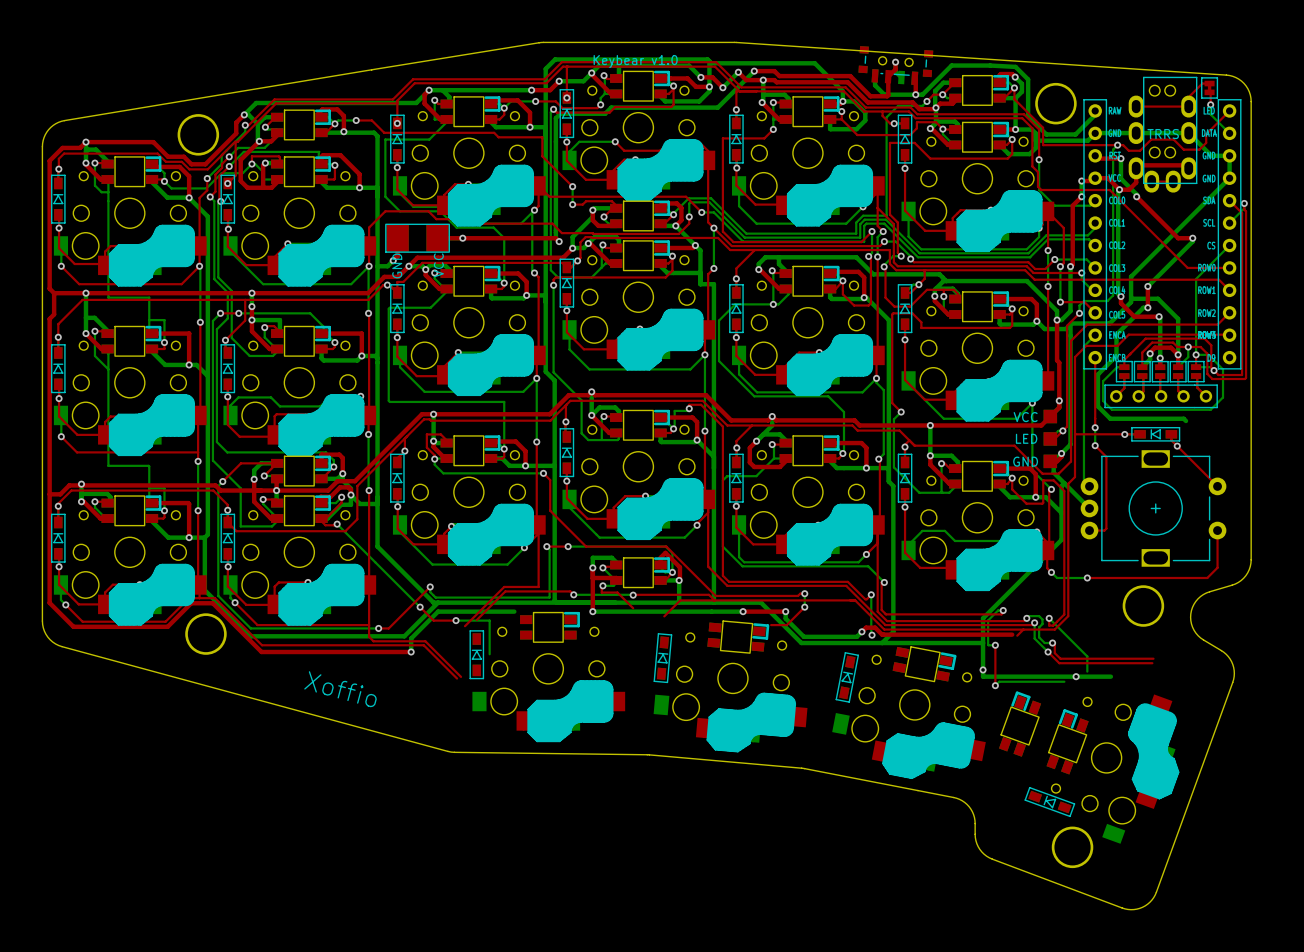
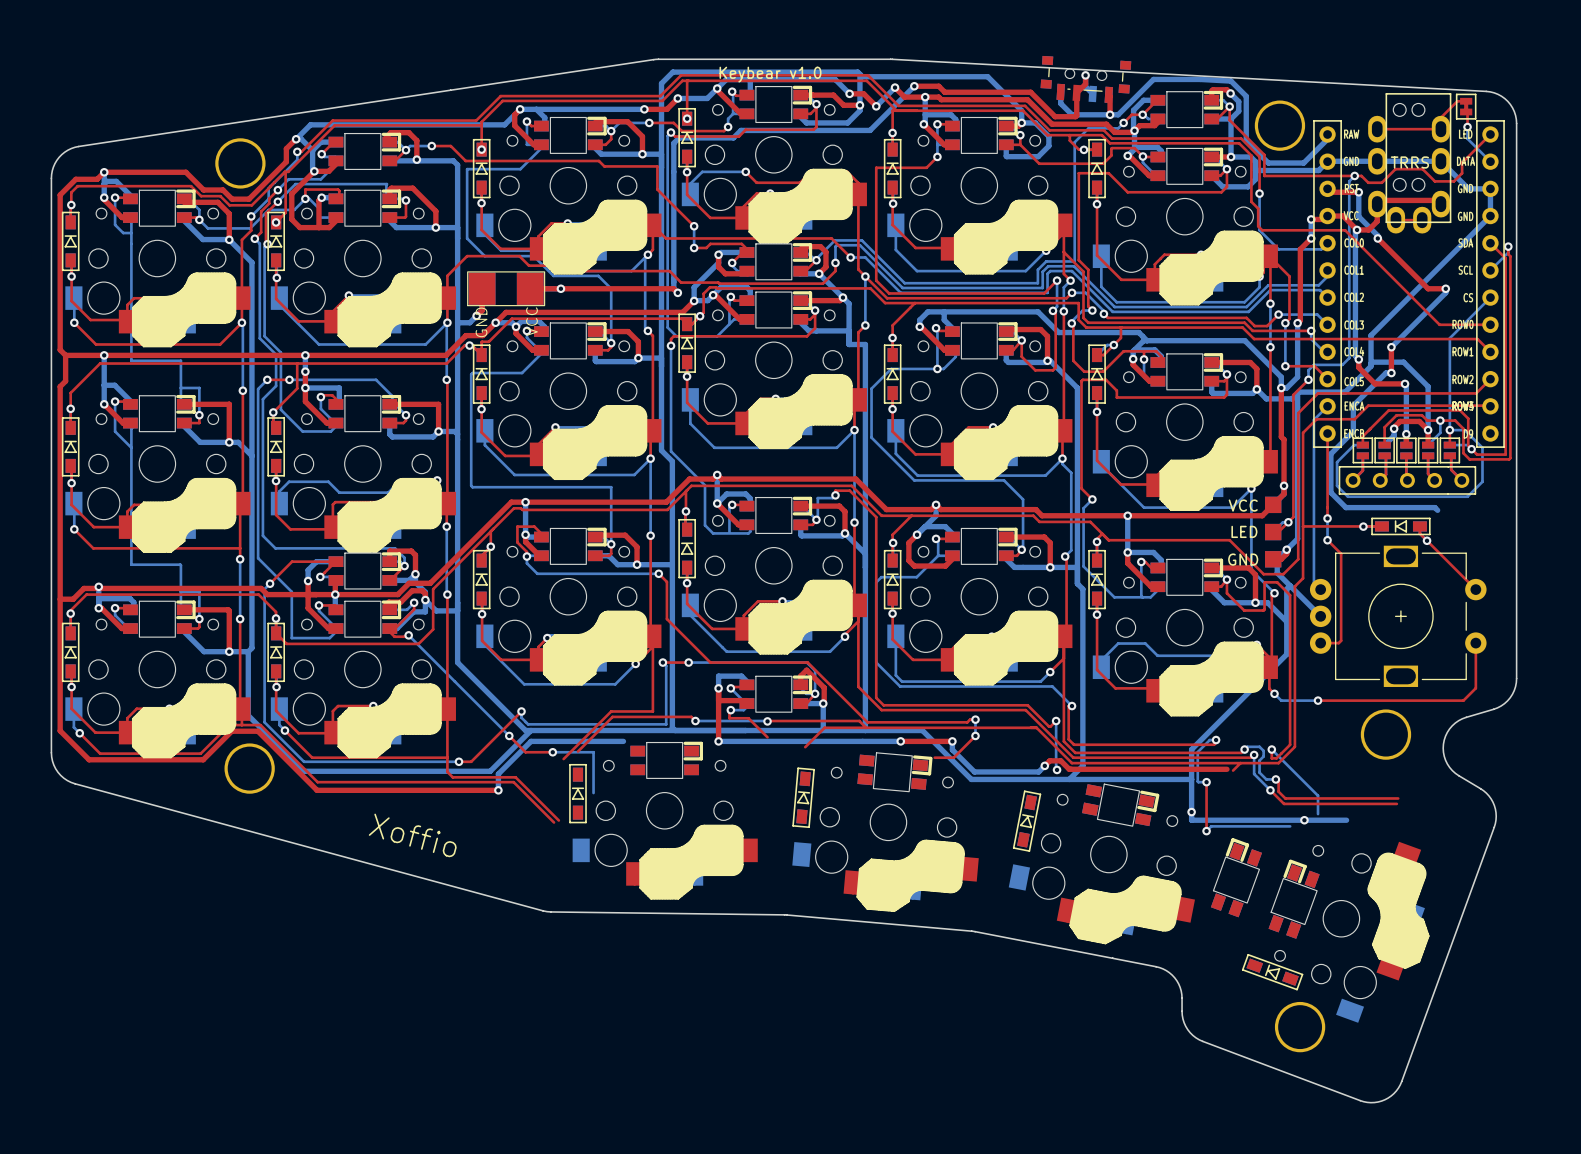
board edge: none -> (890, 59) (1486, 91) (1497, 94) (1507, 101) (1514, 111) (1516, 123)
board edge: (1251, 101) (1249, 91) (1244, 83) (1236, 77) (1226, 75) (735, 42) (543, 42) (64, 120) (55, 123) (48, 129) (44, 137) (42, 147) -> (890, 59) (653, 59) (78, 146) (67, 150) (59, 157) (53, 167) (51, 178)

